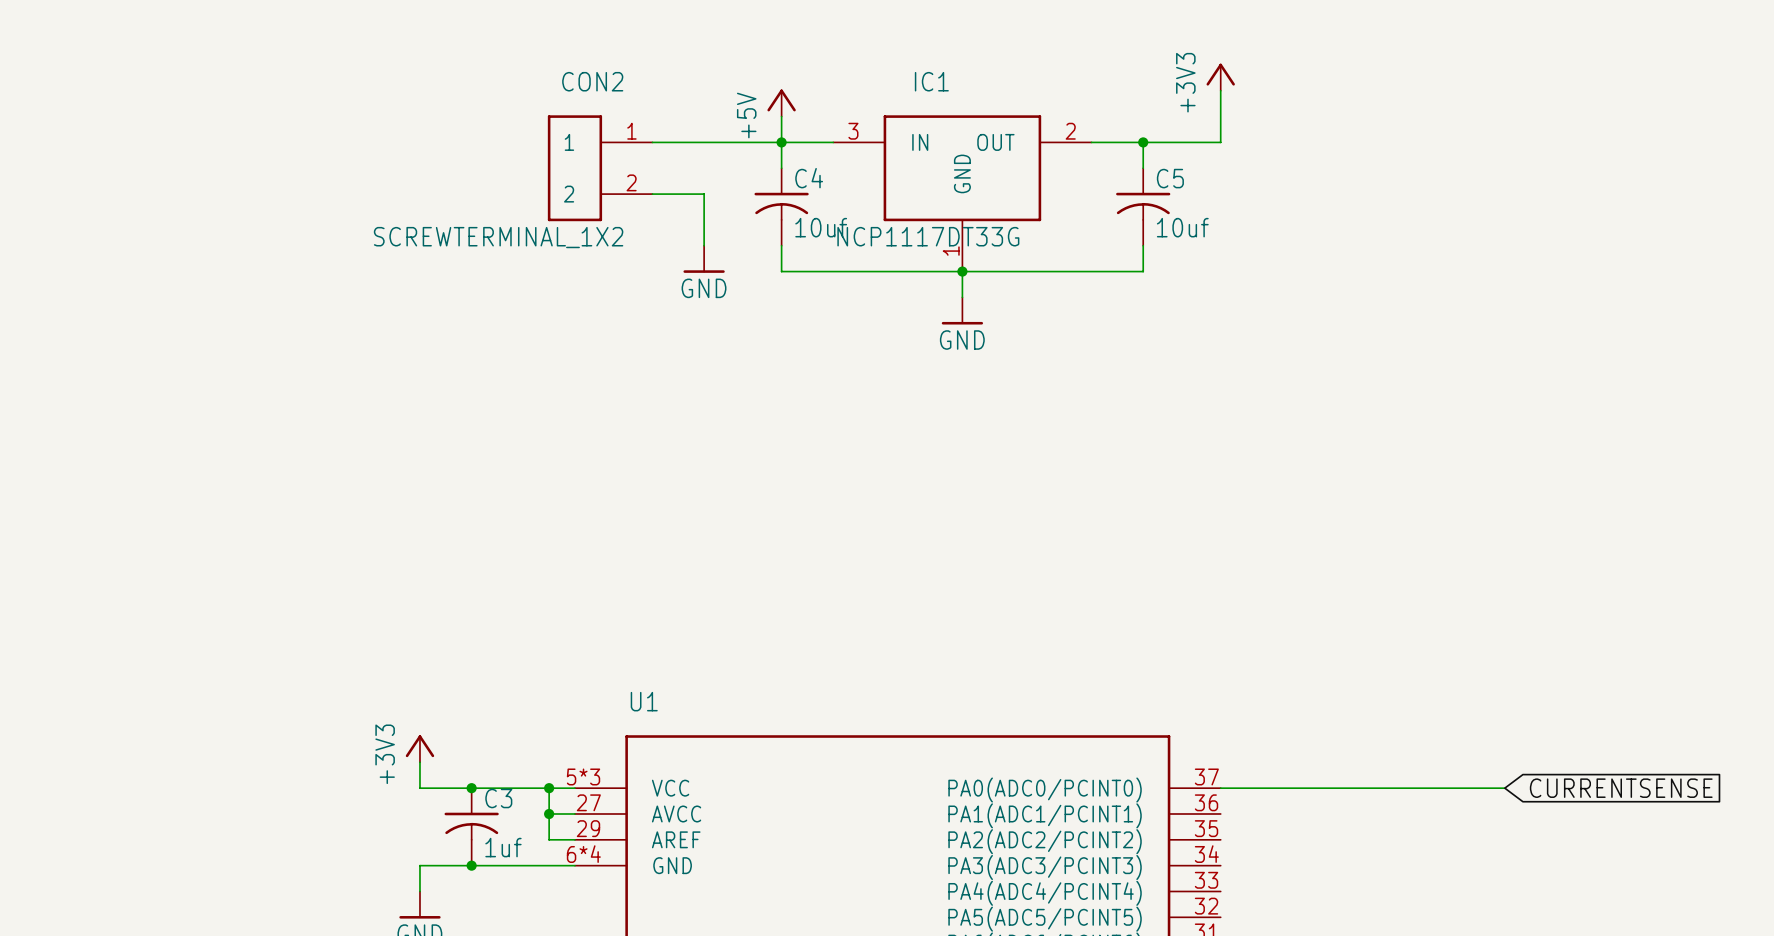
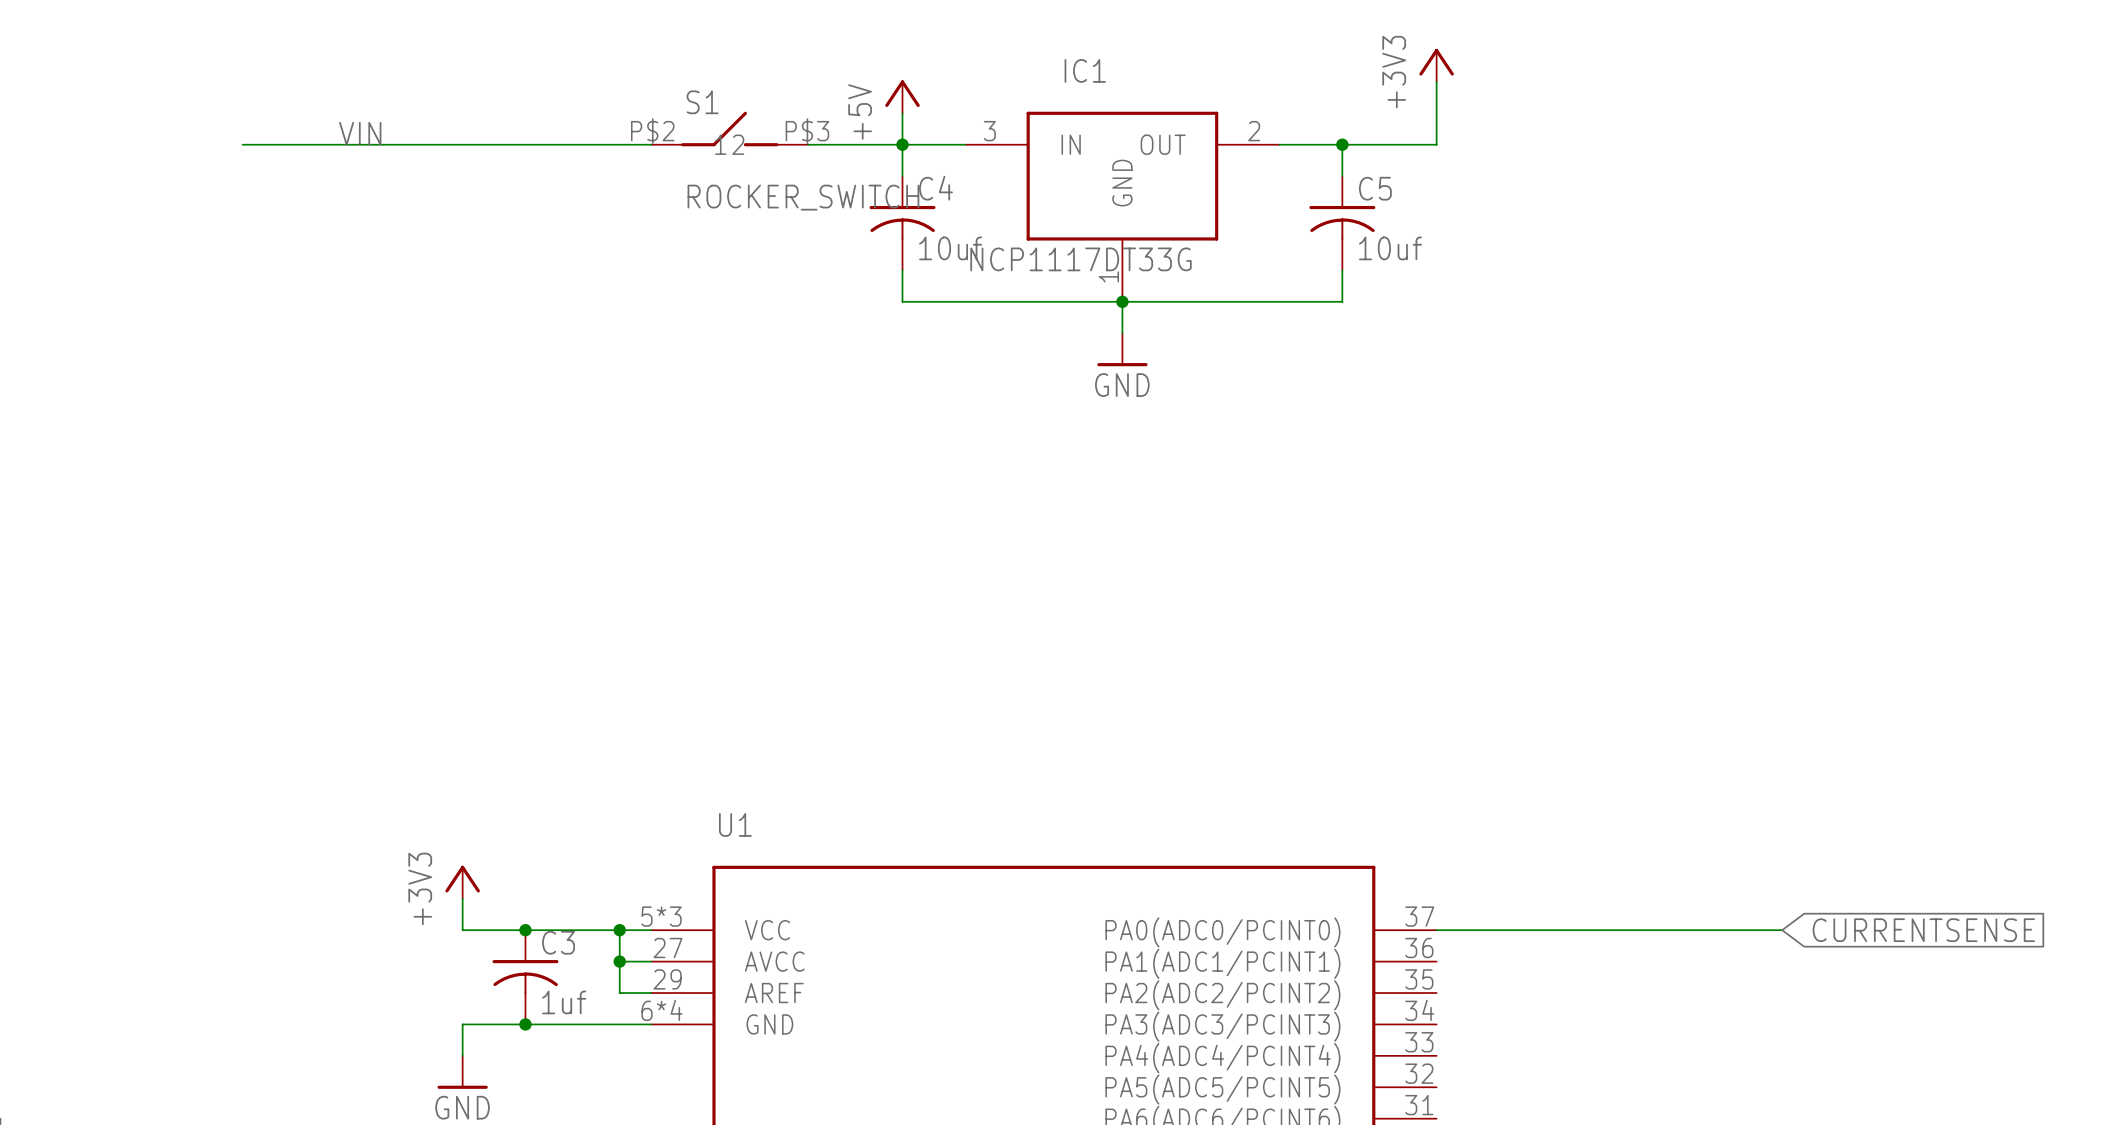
S1: none -> ROCKER_SWITCH (729, 129)
label: none -> VIN (360, 133)
wire: none -> (242, 144) (651, 144)
CON2: SCREWTERMINAL_1X2 (600, 168) -> none
wire: (652, 194) (704, 194) (704, 245) -> none
power symbol: GND (704, 259) -> none

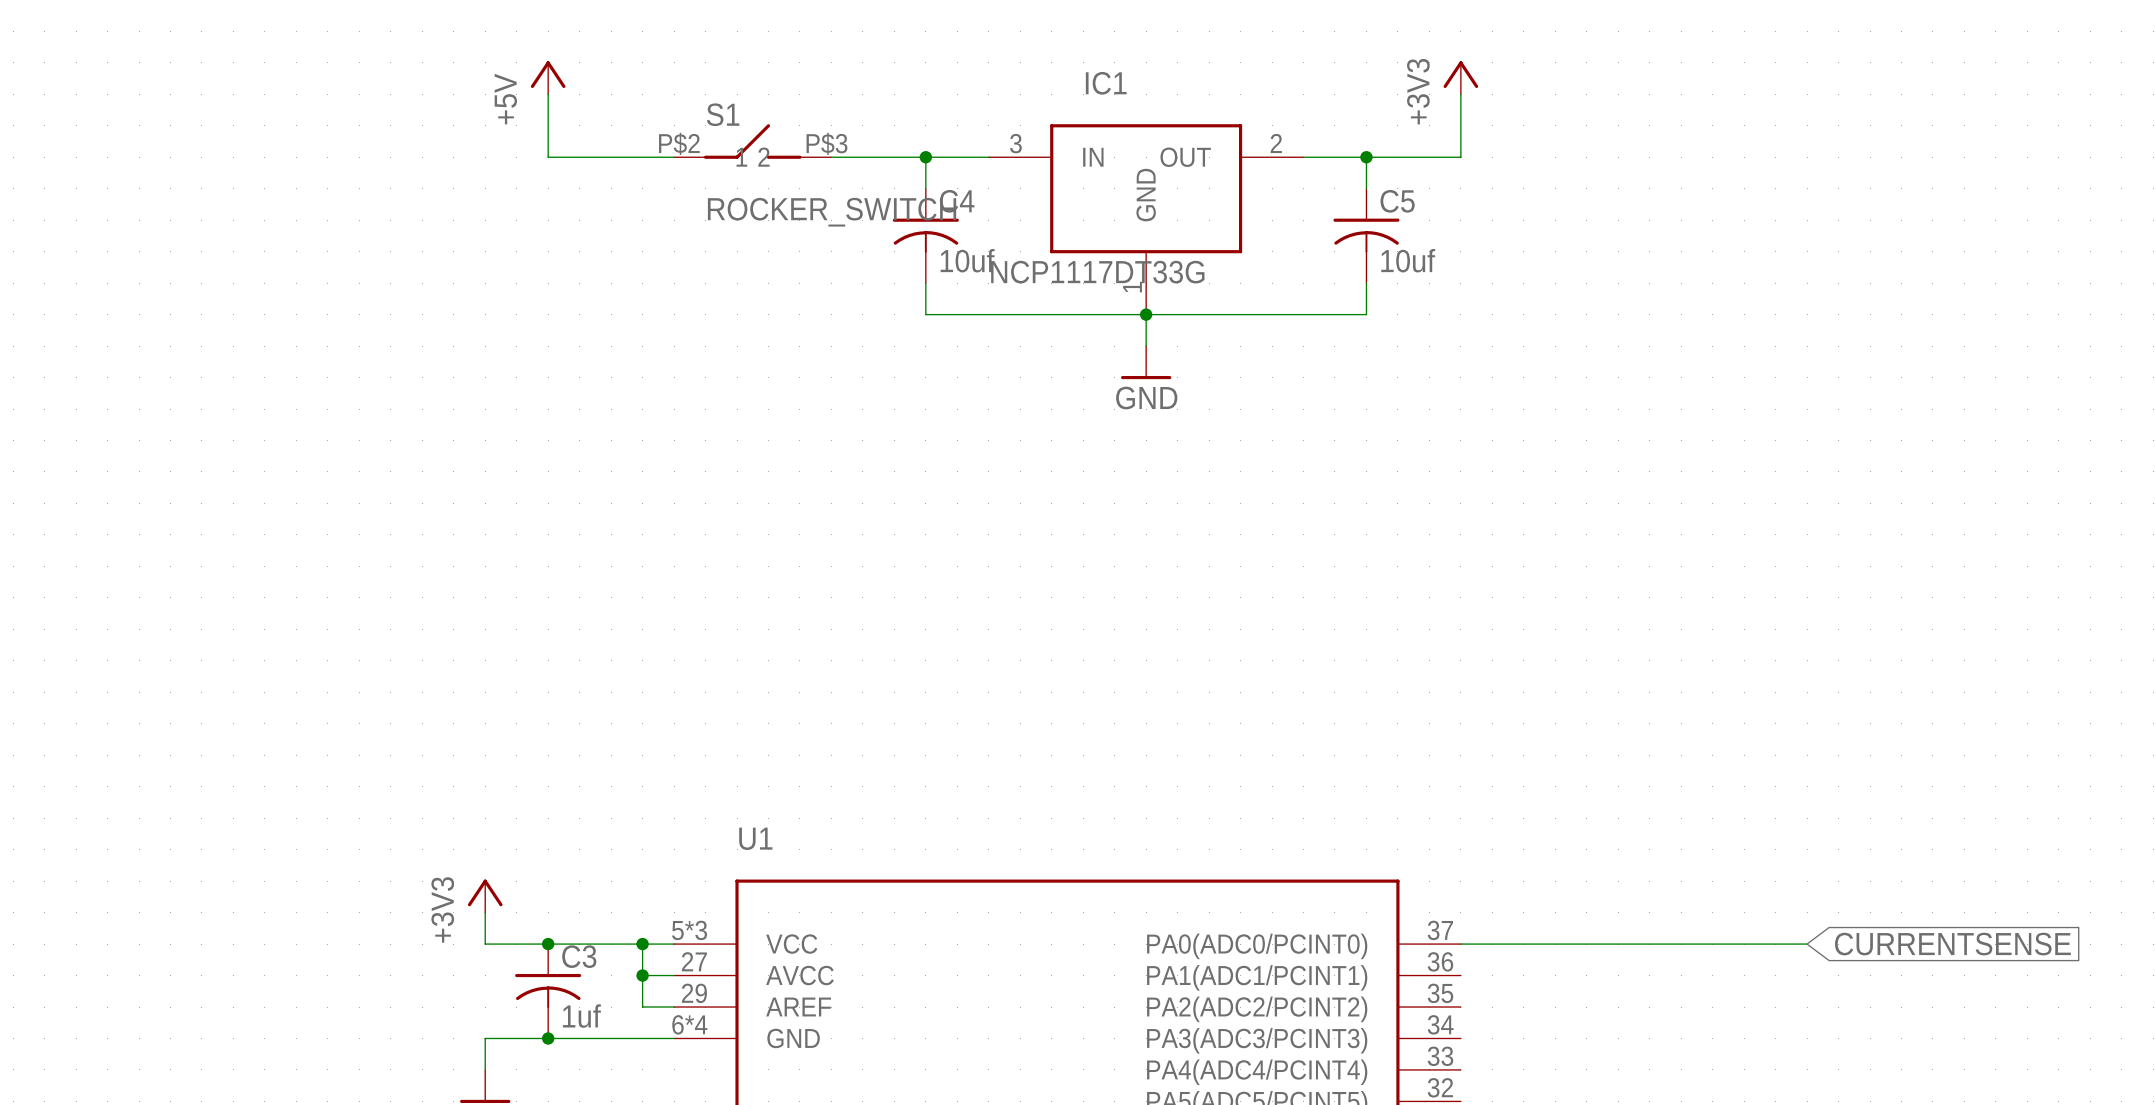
power symbol: none -> +5V (548, 77)
power symbol: +5V (902, 96) -> none
wire: (902, 113) (902, 144) -> none
label: VIN (360, 133) -> none
wire: (242, 144) (525, 144) -> (548, 94) (548, 157)

